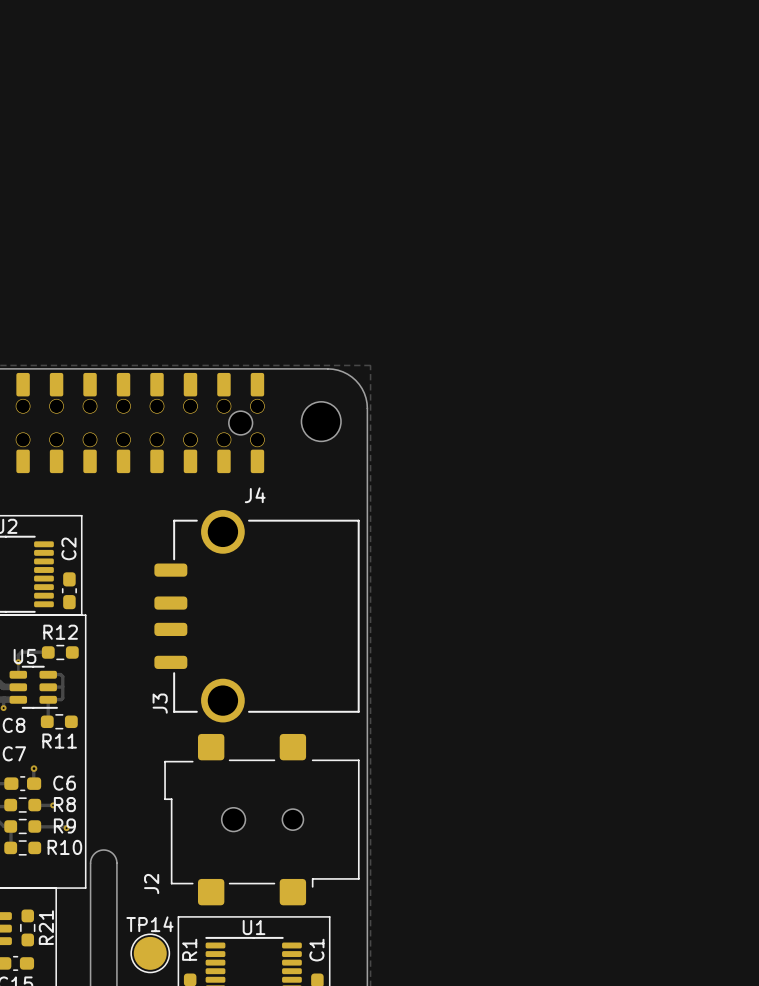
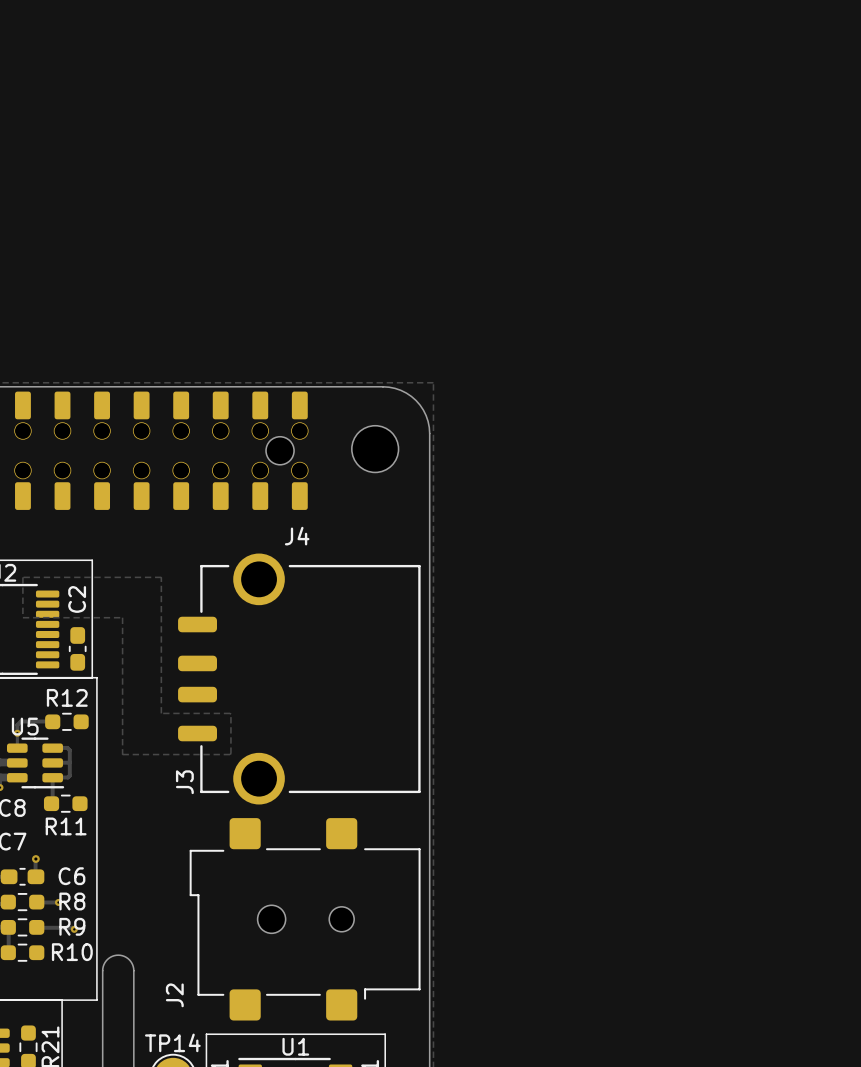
zone outline: none -> (22, 577) (161, 577) (161, 713) (230, 713) (230, 753) (122, 754) (122, 617) (22, 617) (22, 577)

